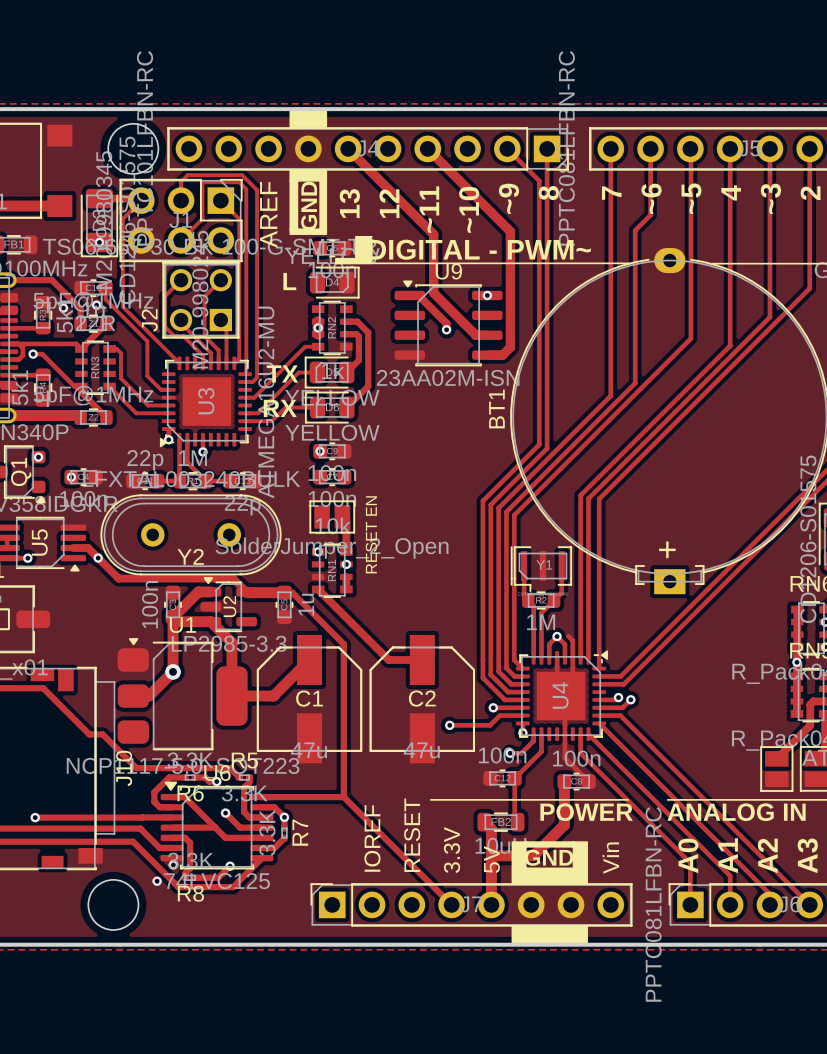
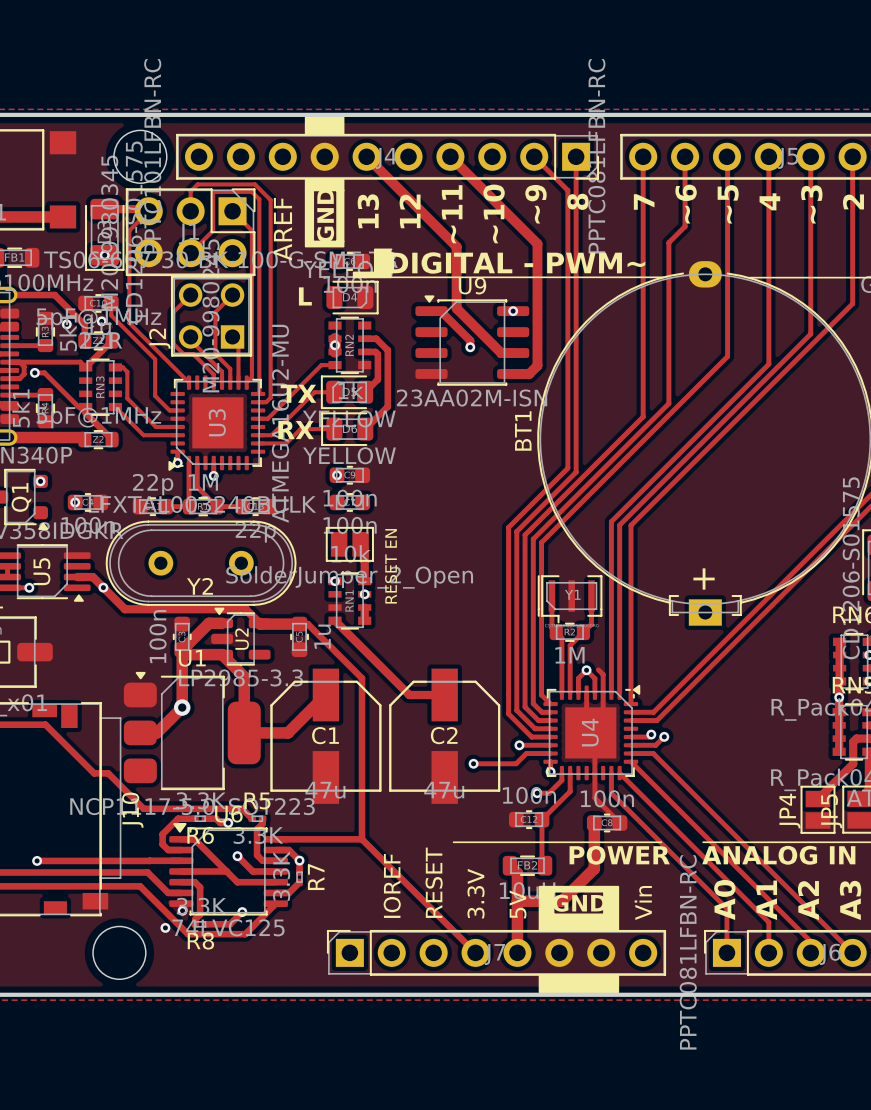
JP4 name: none -> JP4 (789, 811)
JP5 name: none -> JP5 (831, 811)

